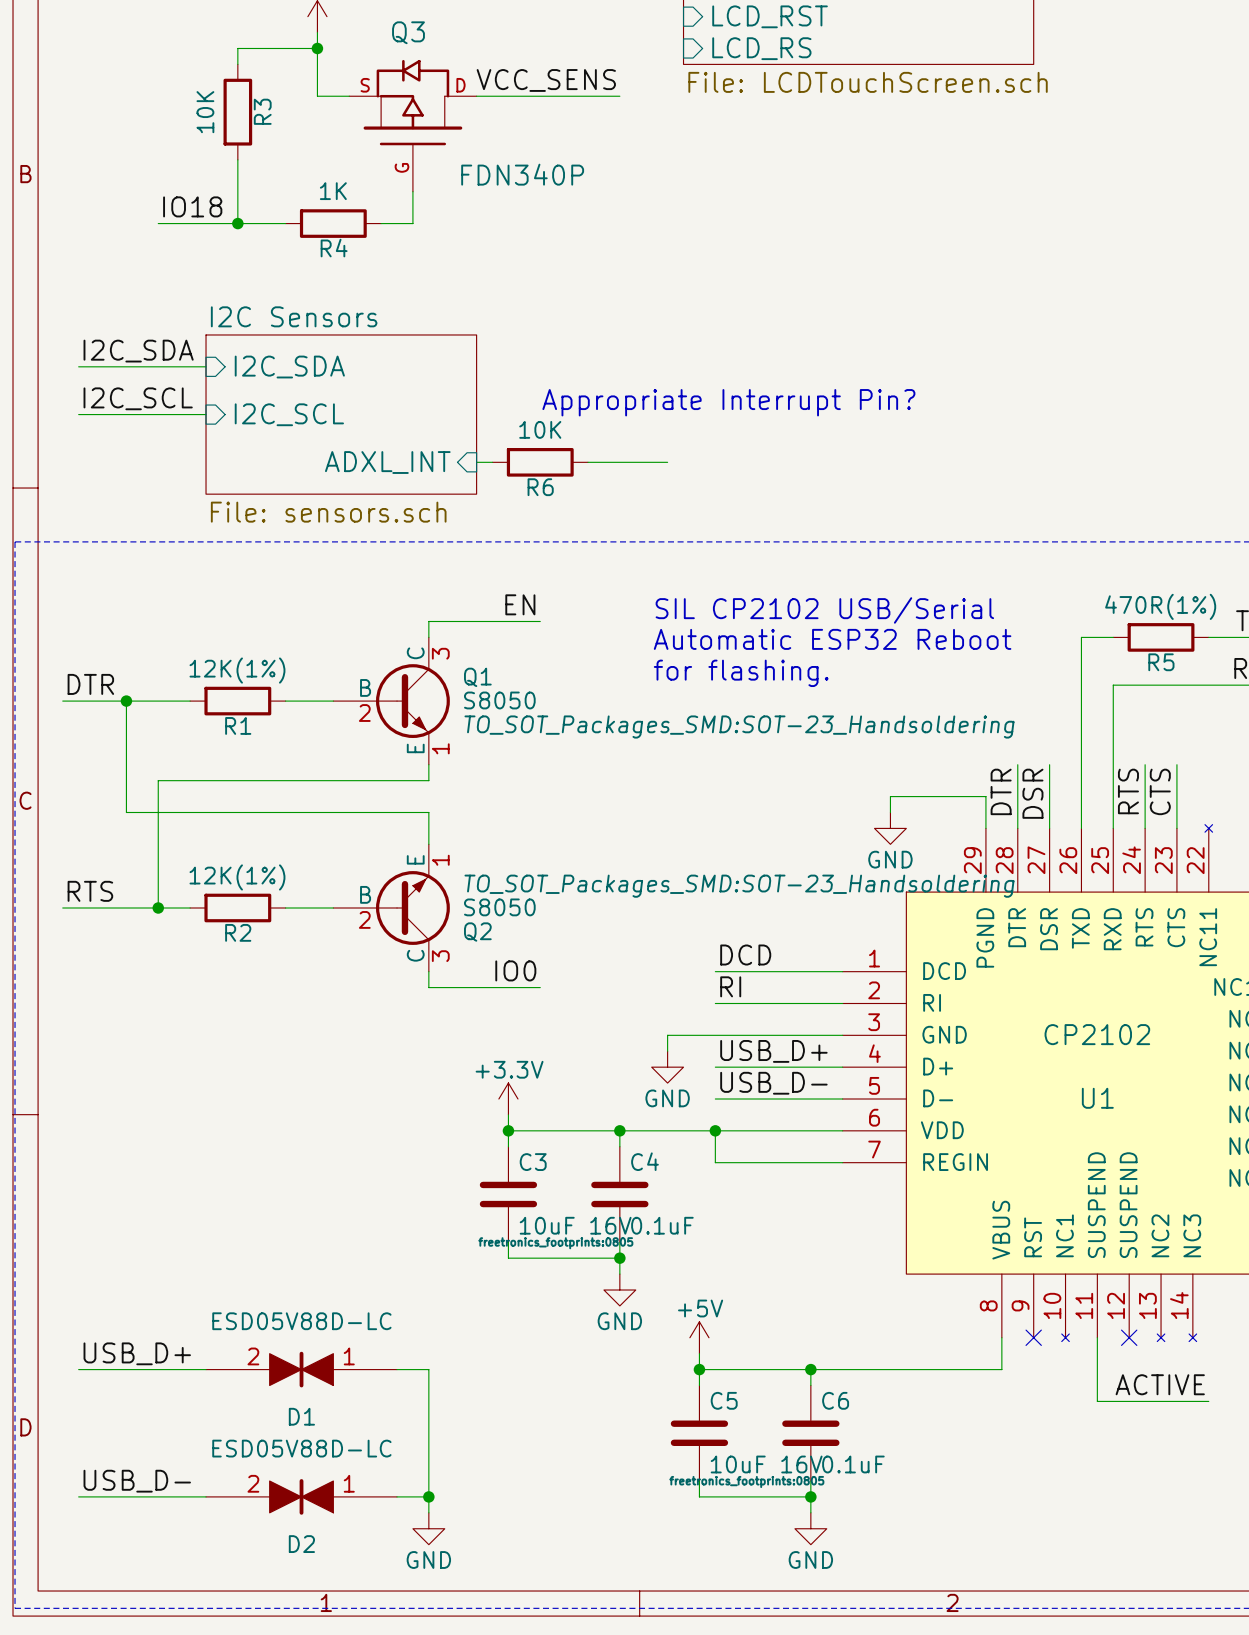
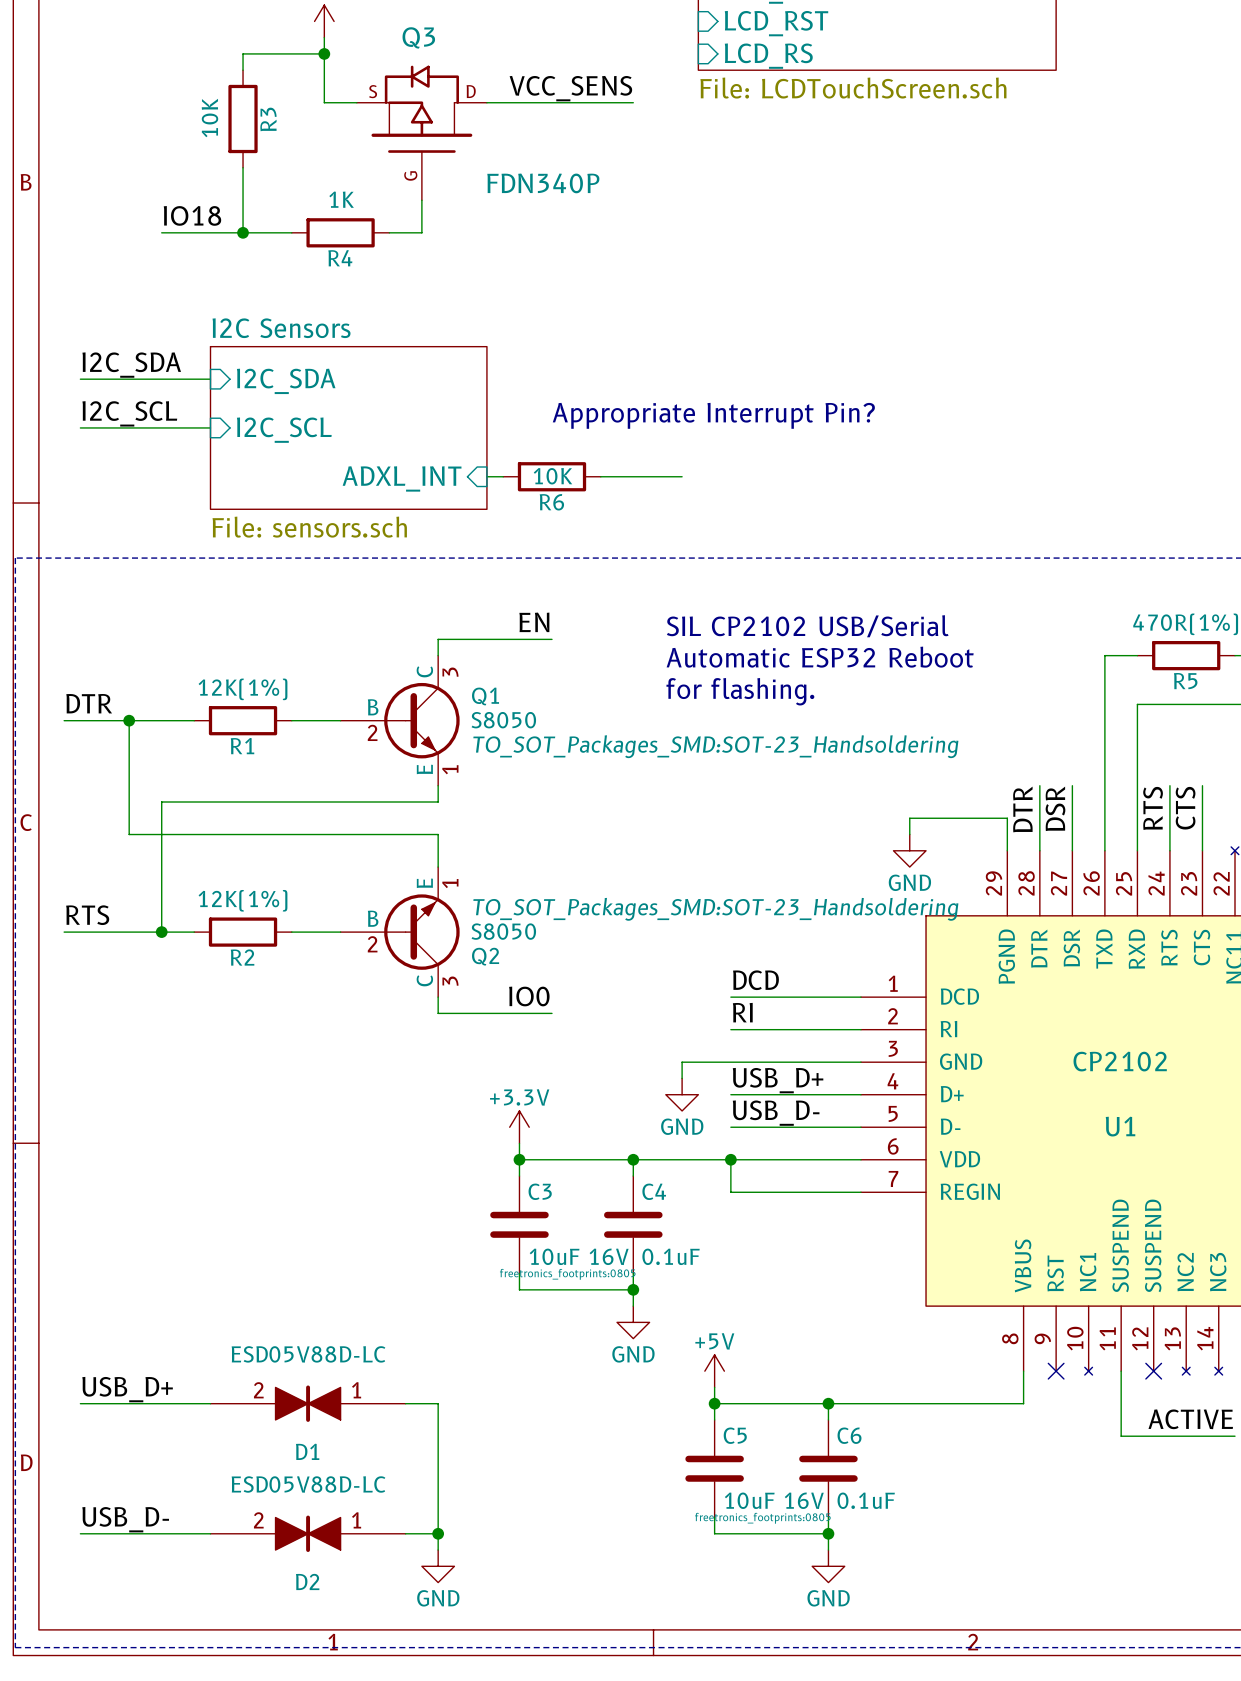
R6 value position: 10K (540, 429) -> 10K (552, 476)

